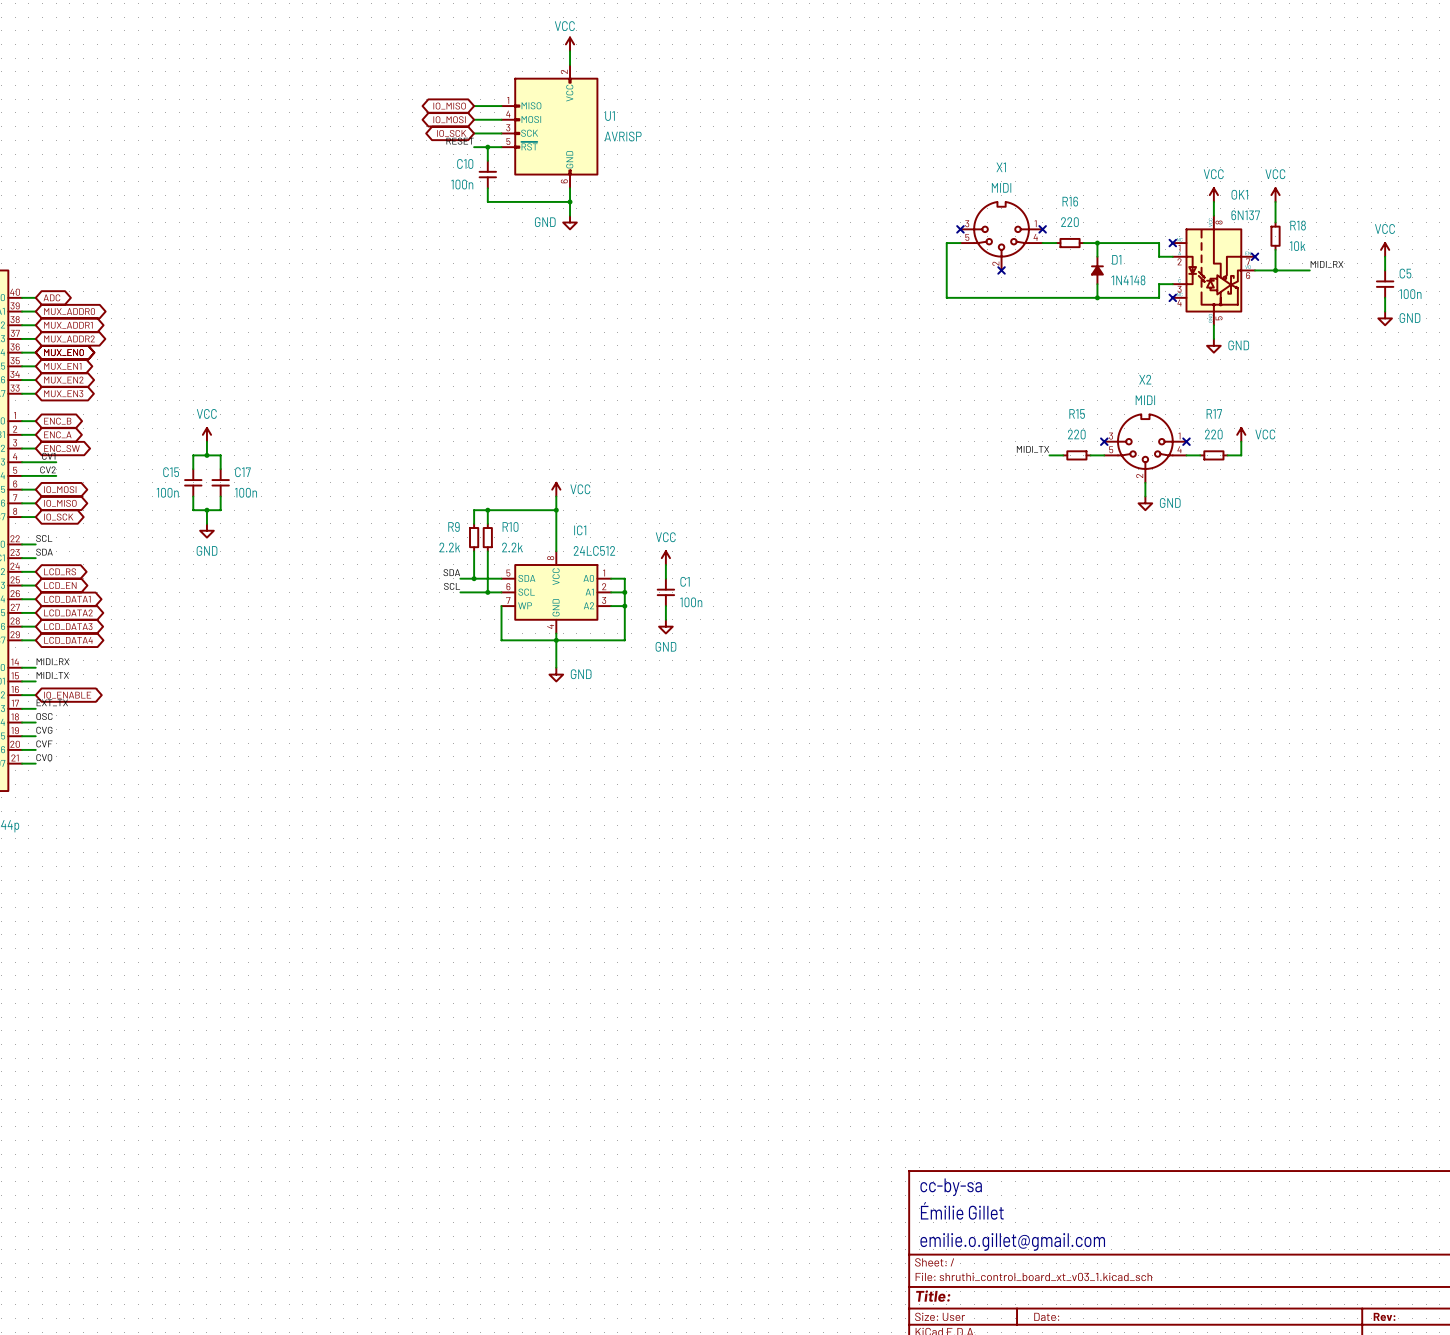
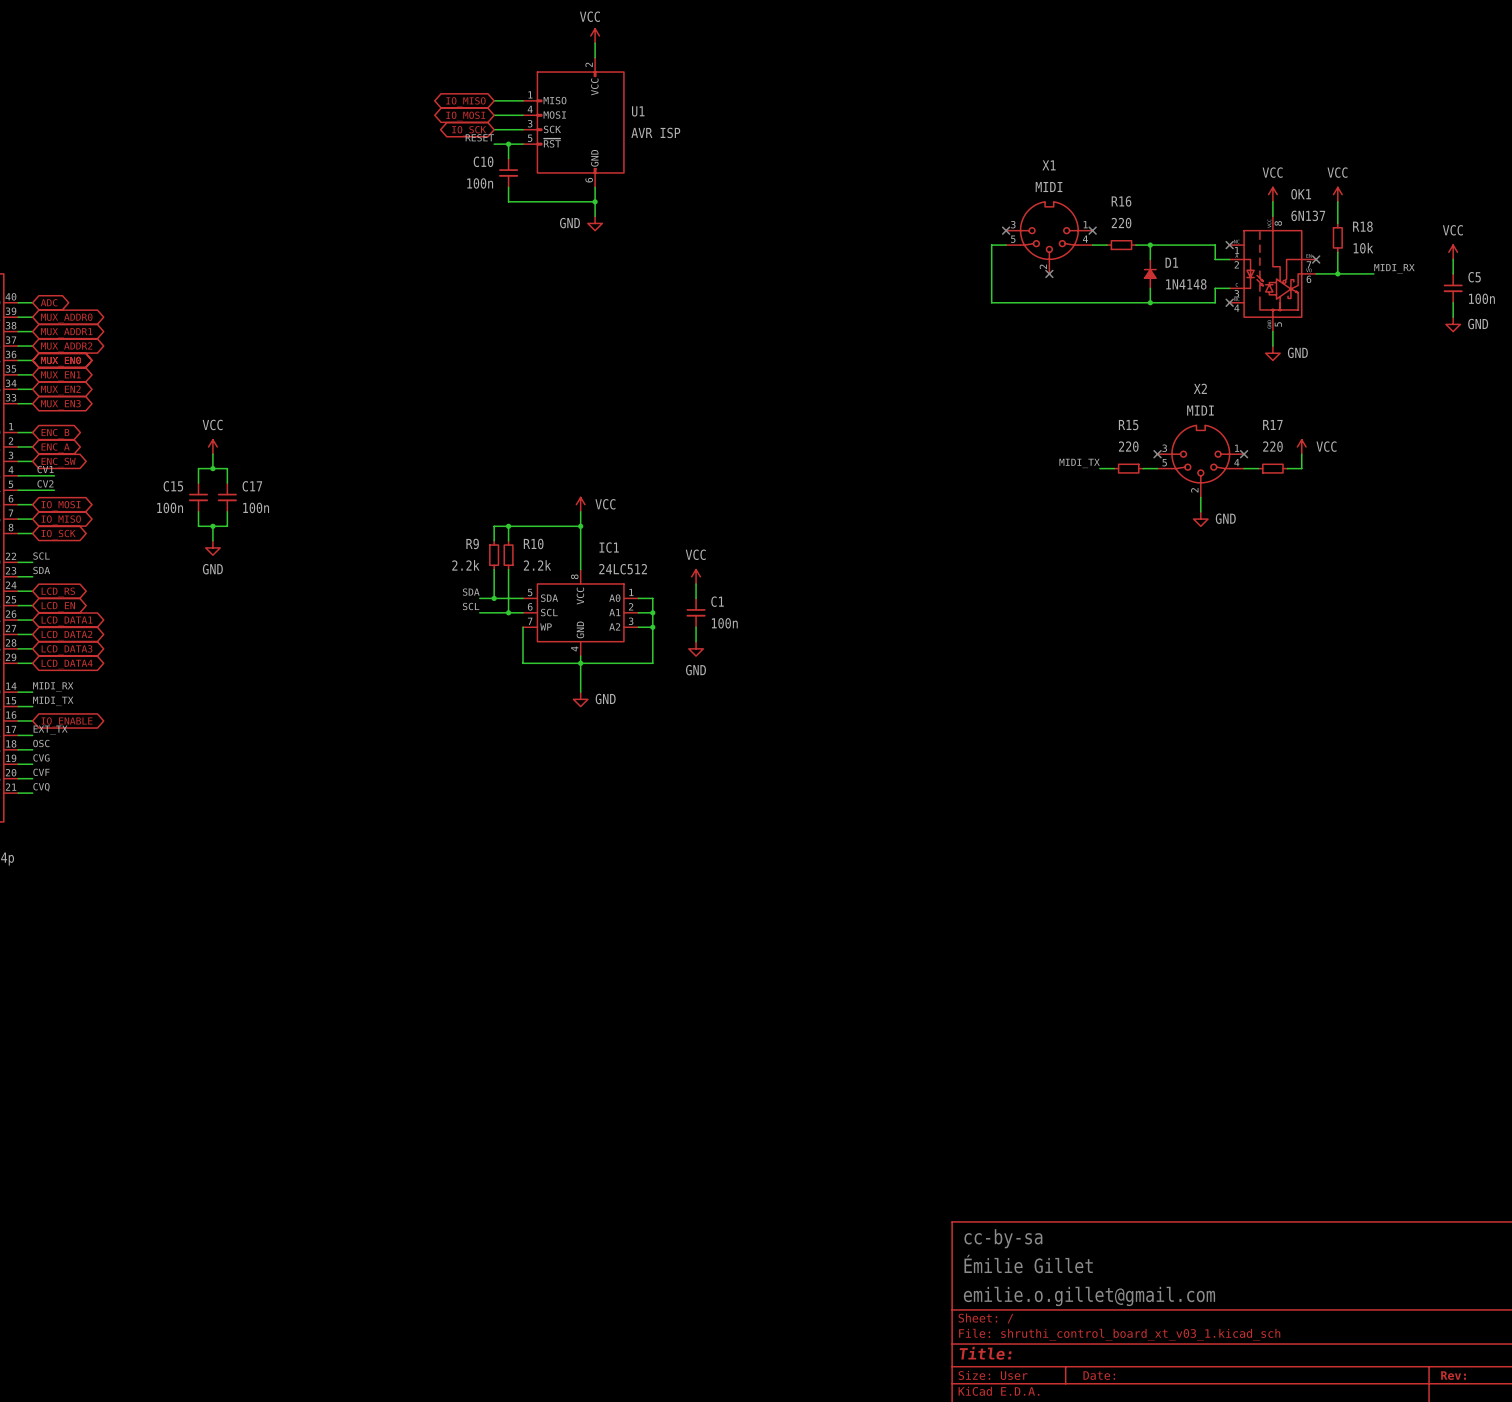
U1 value: AVRISP (623, 136) -> AVR ISP (655, 132)

